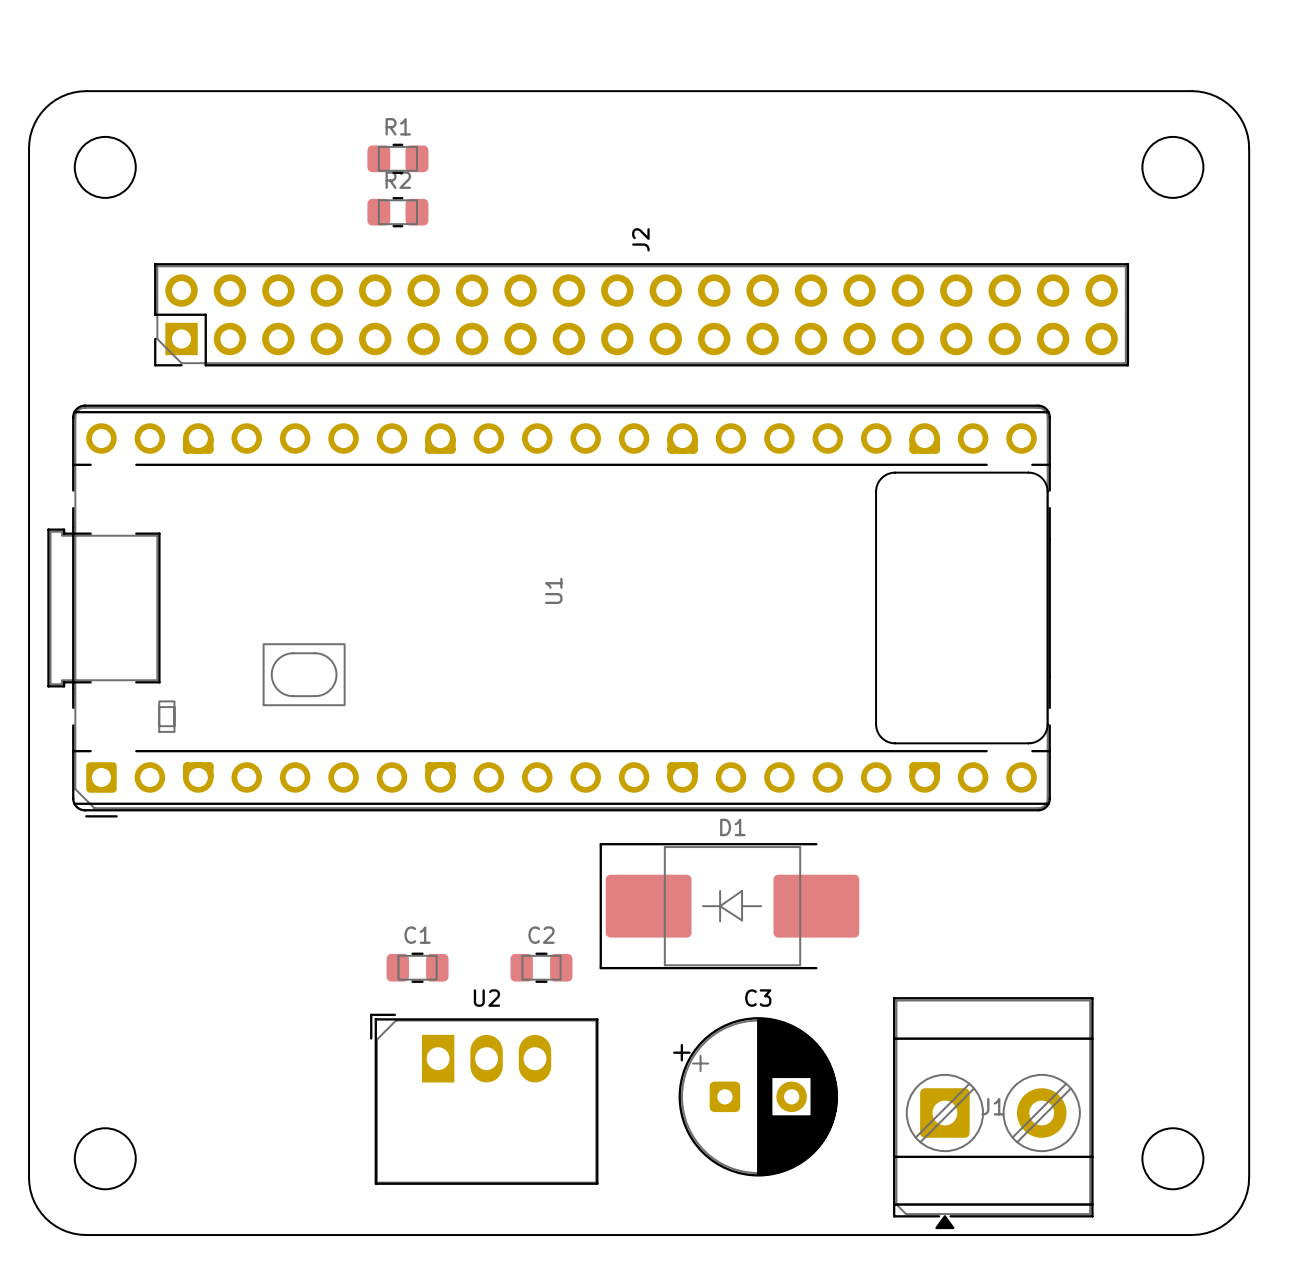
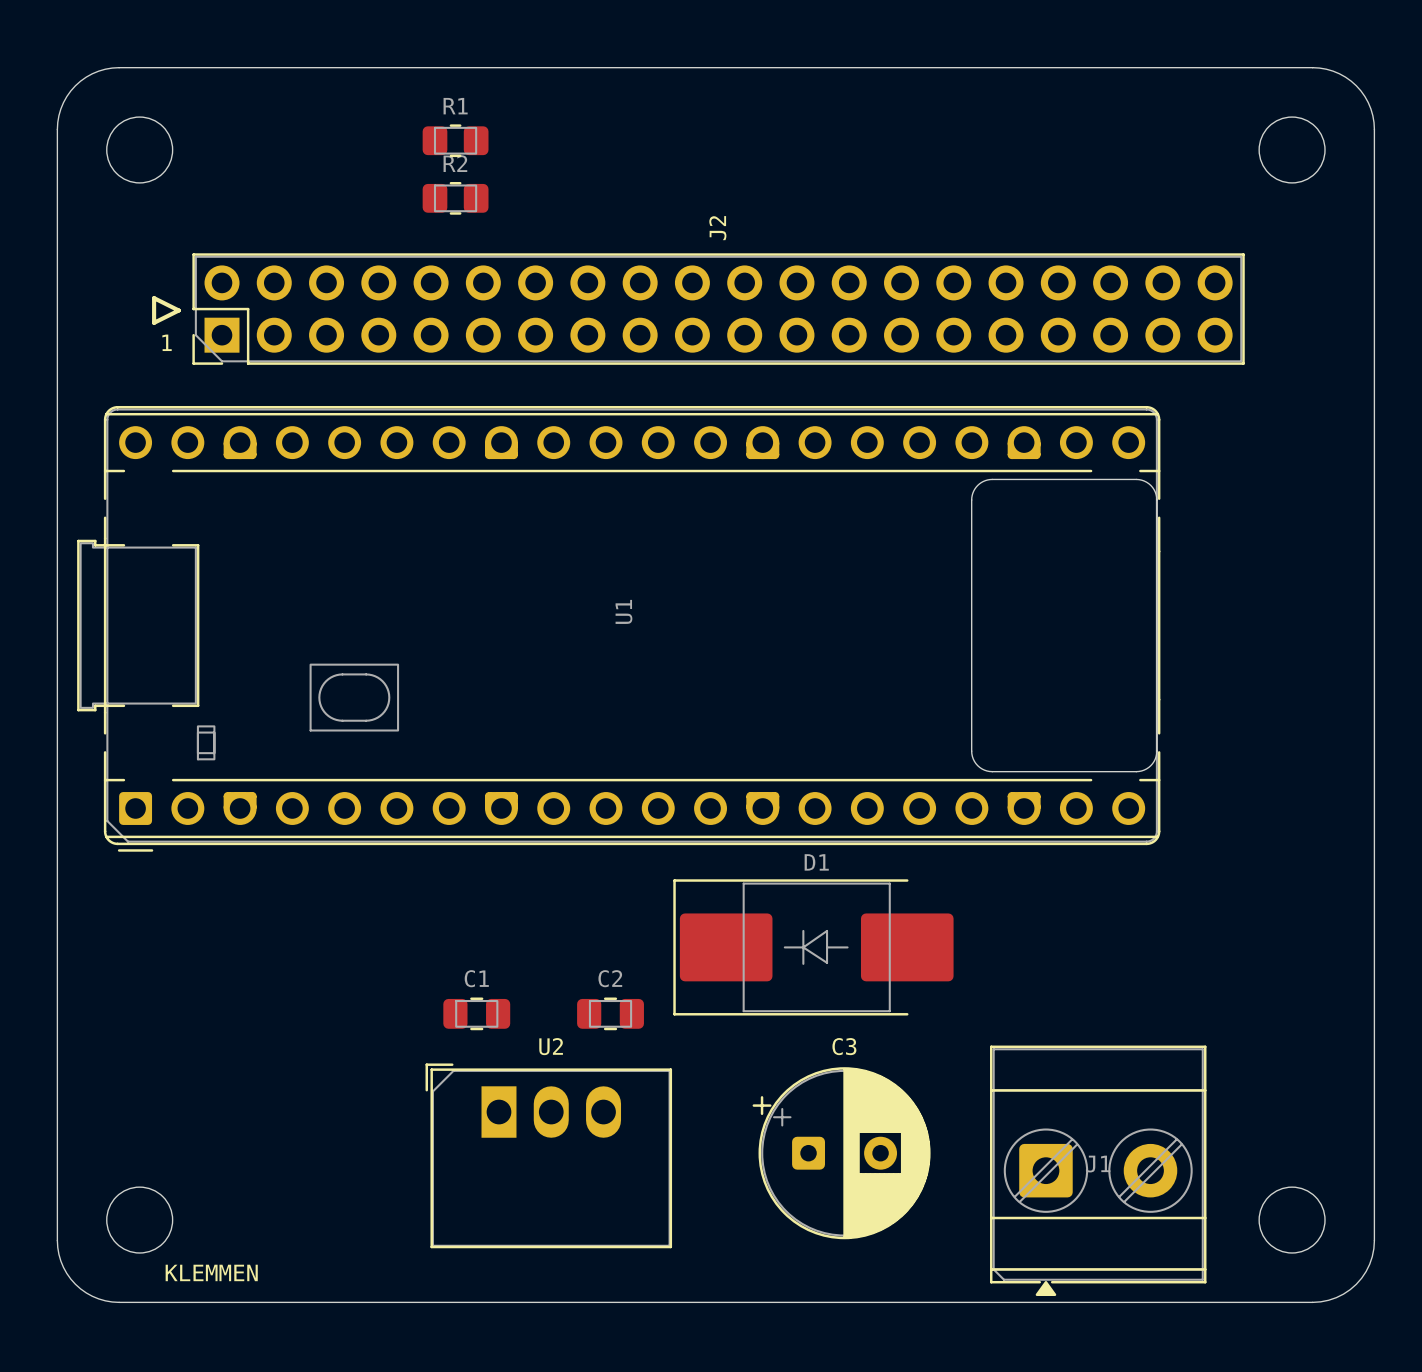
line: none -> (154, 298) (154, 322) (178, 310) (154, 298)
text: none -> 1 (167, 342)
text: none -> KLEMMEN (211, 1272)

